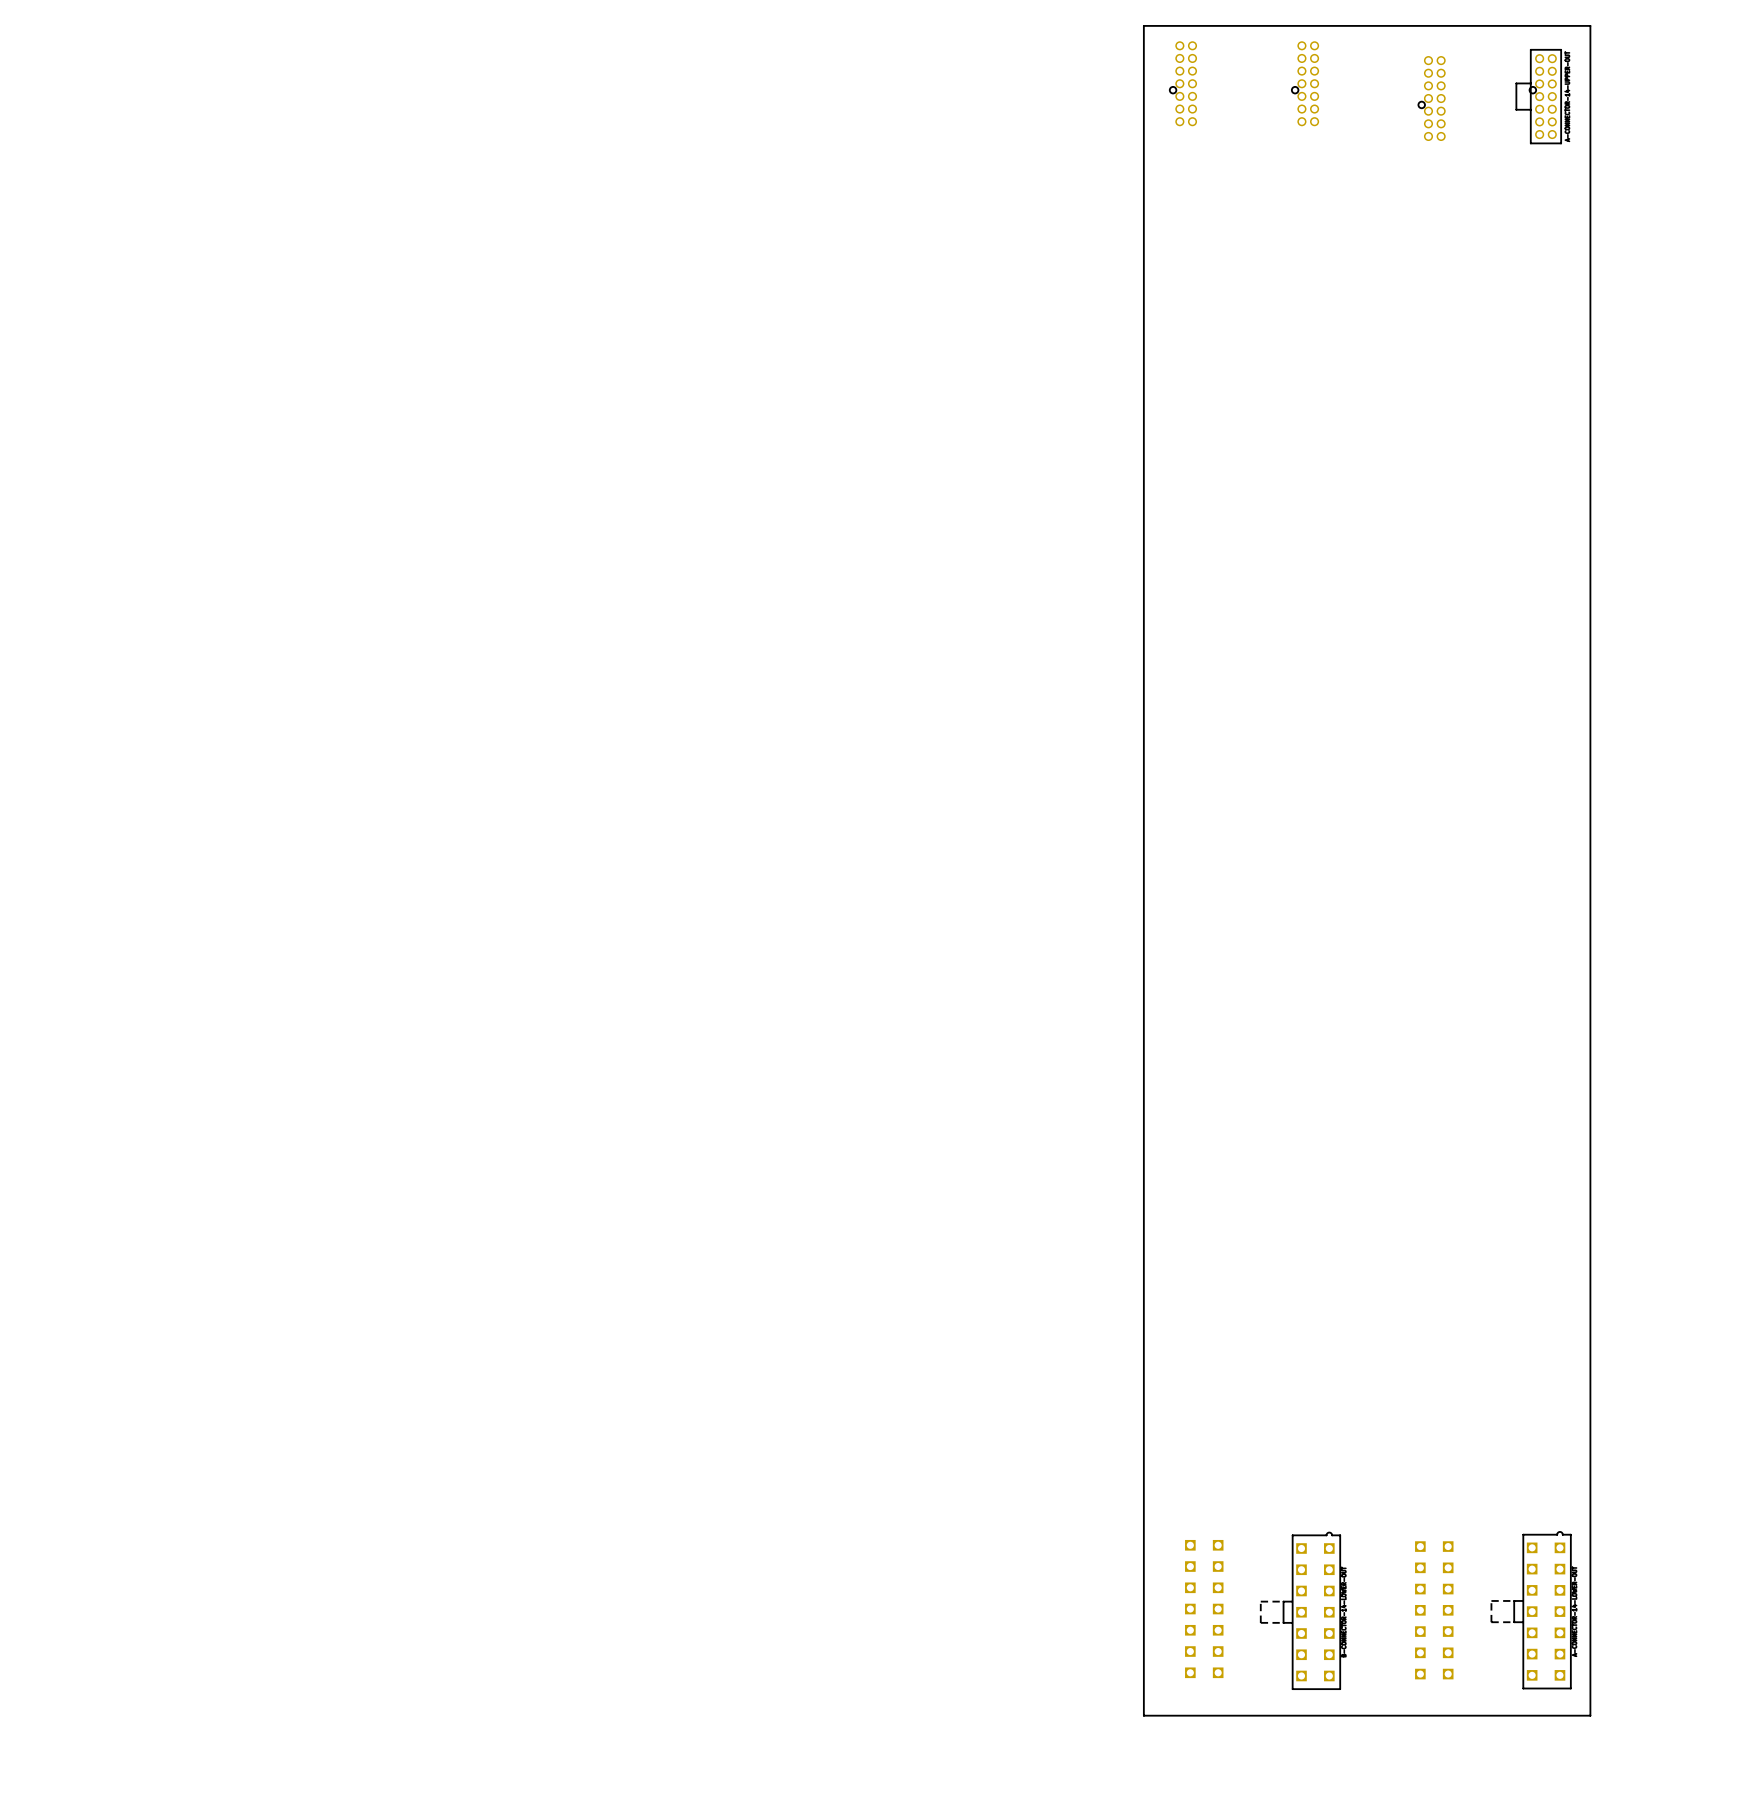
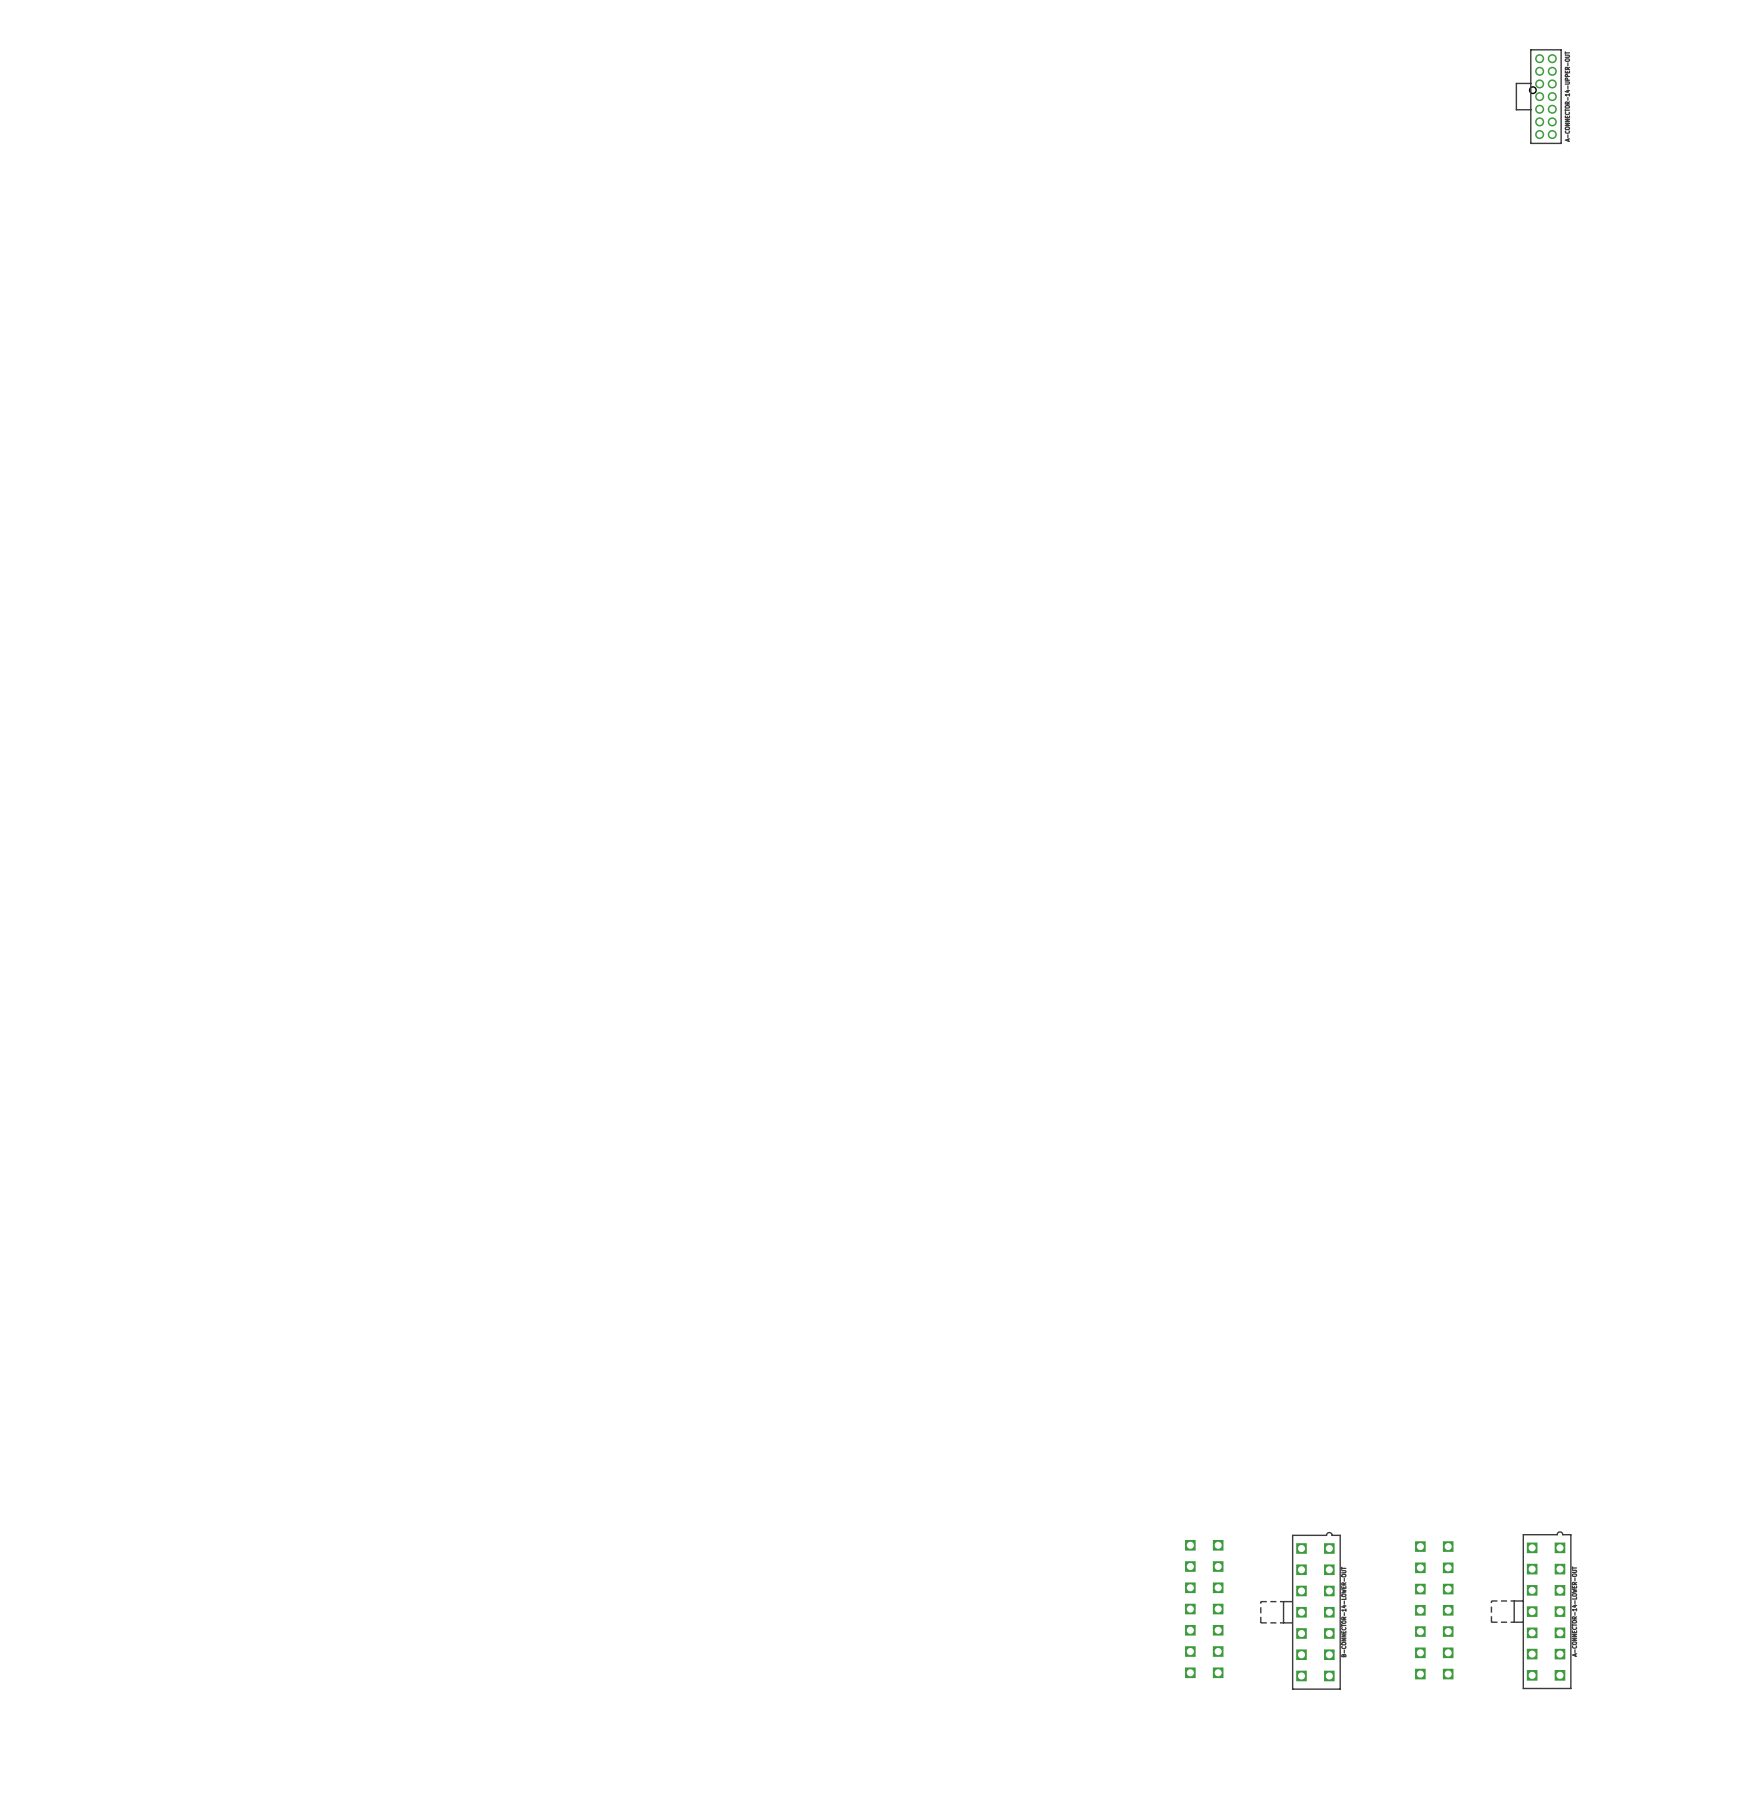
board edge: (1590, 25) (1590, 1715) (1143, 1715) (1143, 25) (1590, 25) -> none
part: (1183, 83) -> none
part: (1305, 83) -> none
part: (1432, 98) -> none

